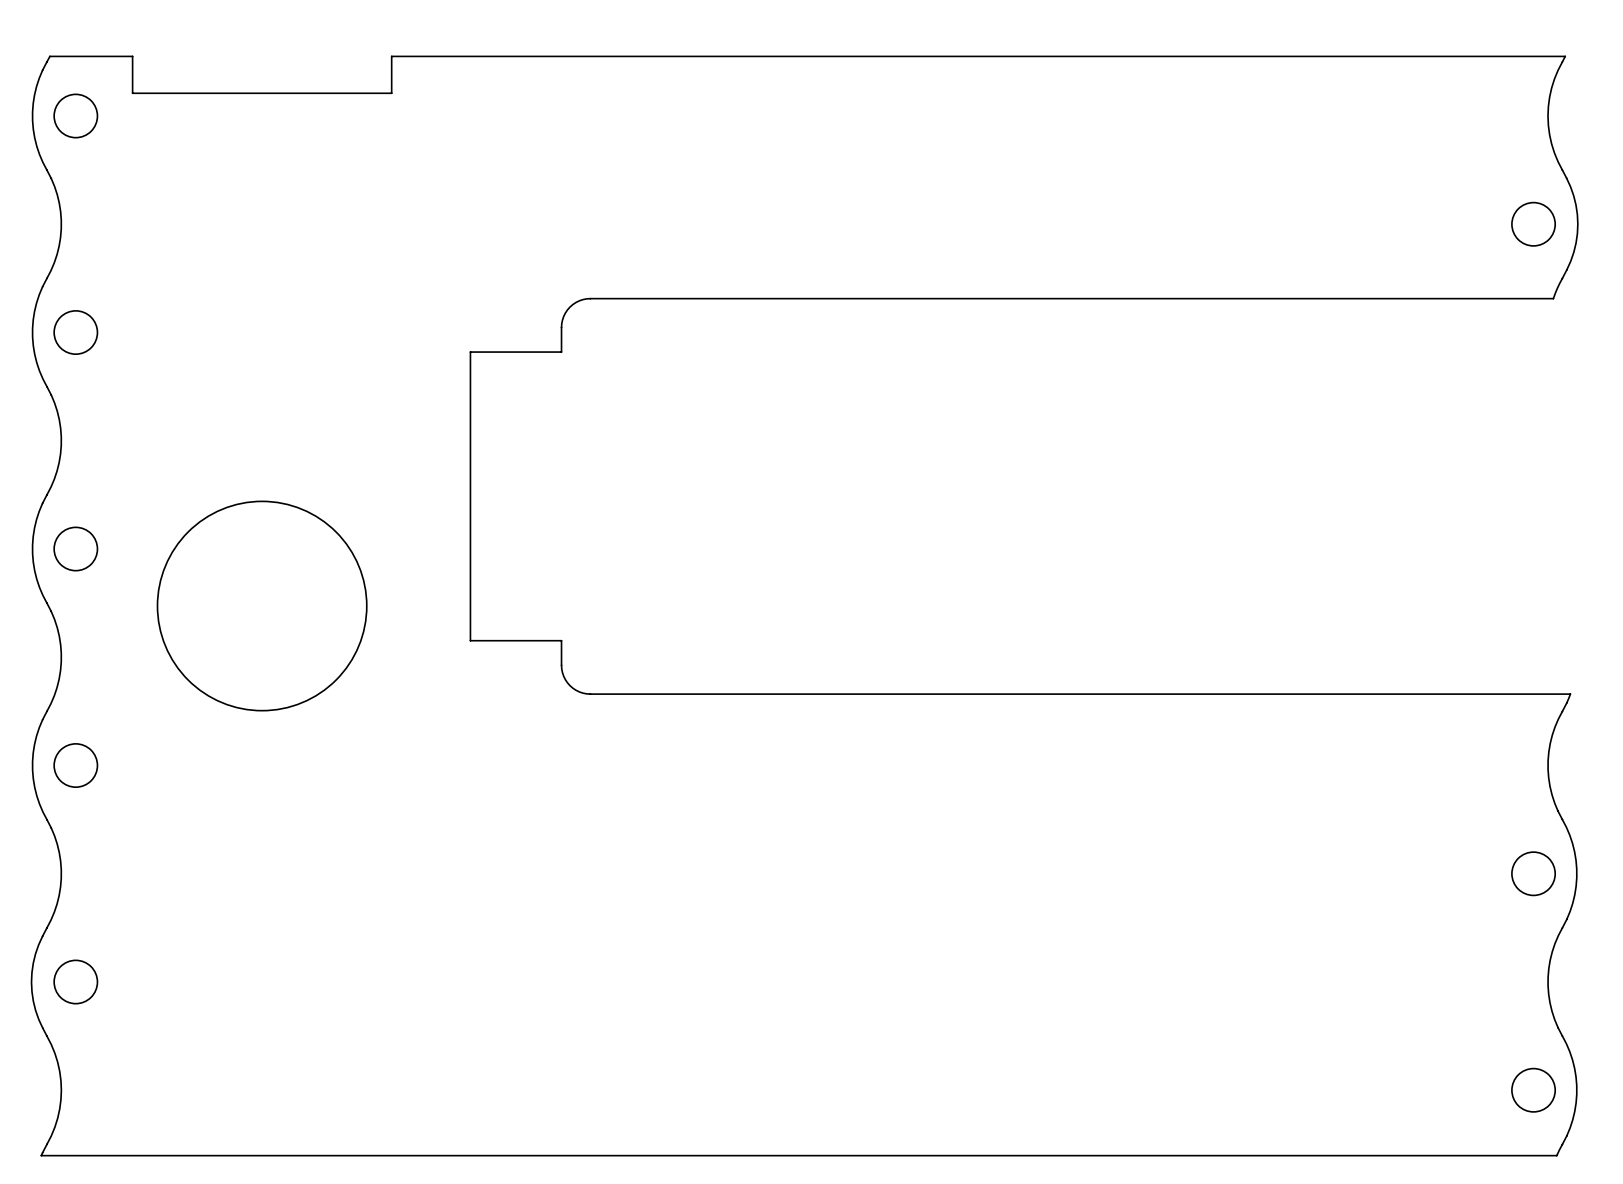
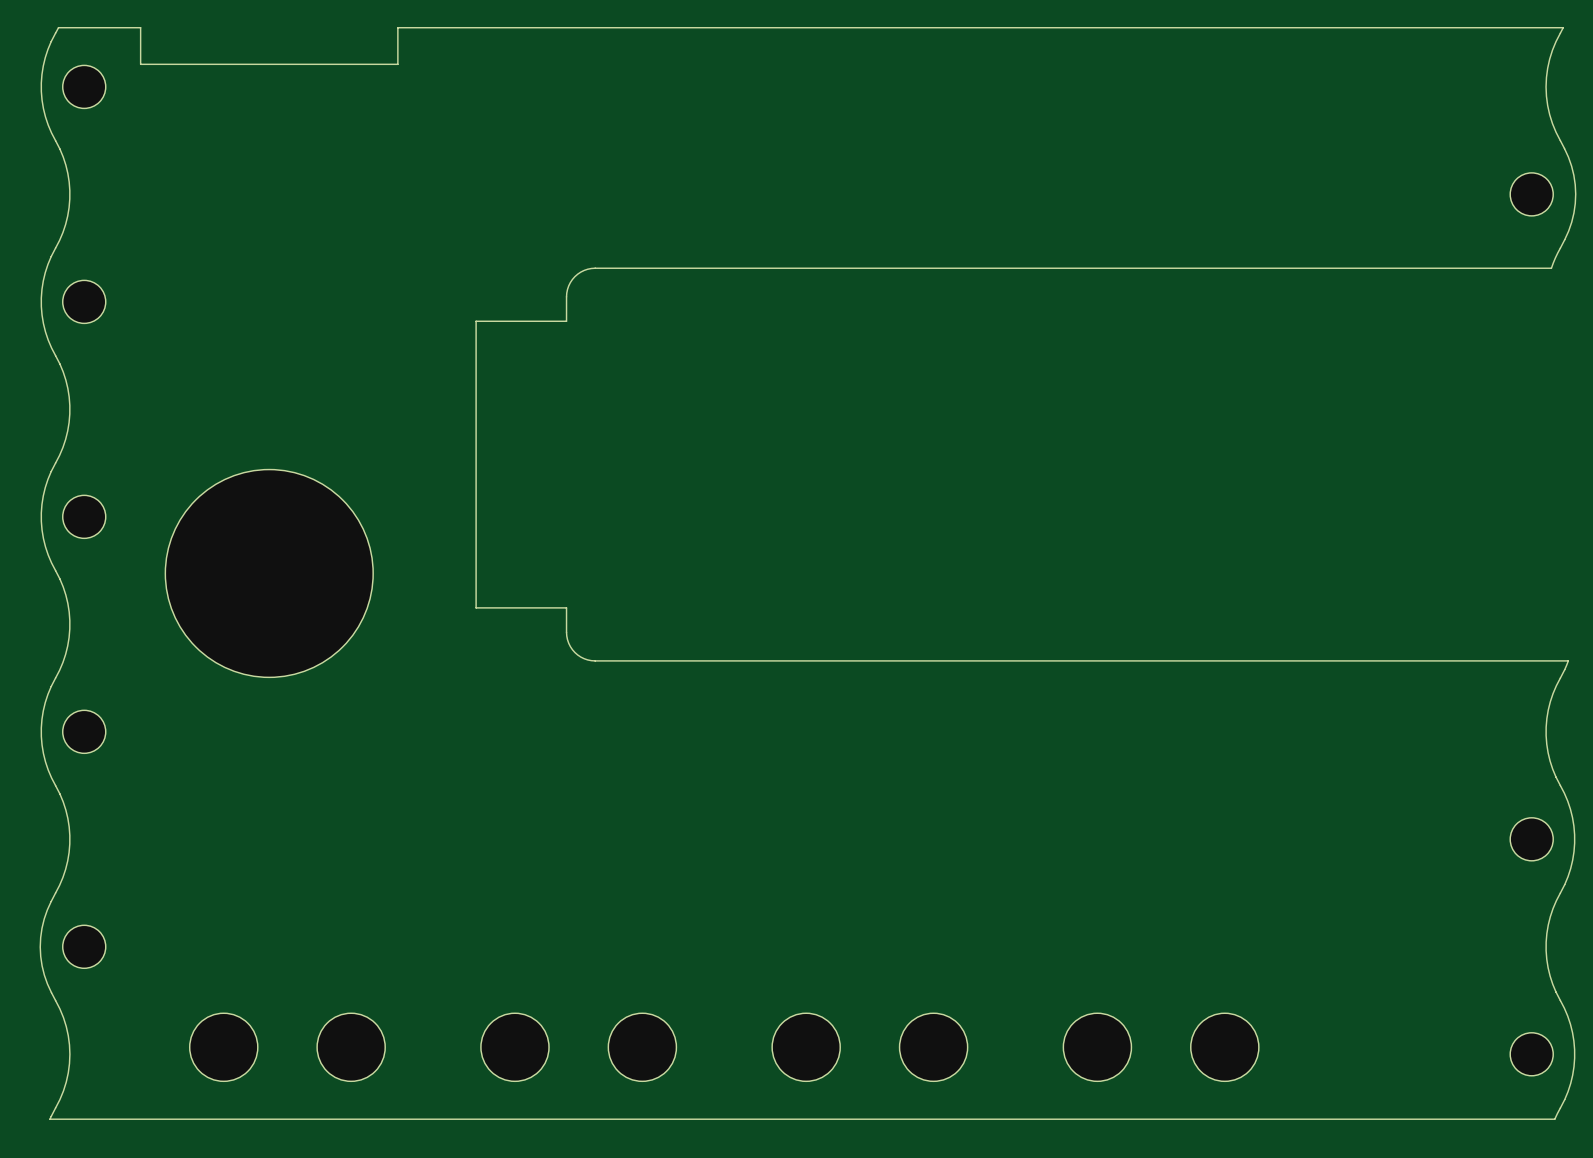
hole: none -> (223, 1047)
hole: none -> (351, 1047)
hole: none -> (514, 1047)
hole: none -> (642, 1047)
hole: none -> (806, 1047)
hole: none -> (933, 1047)
hole: none -> (1097, 1047)
hole: none -> (1224, 1047)

